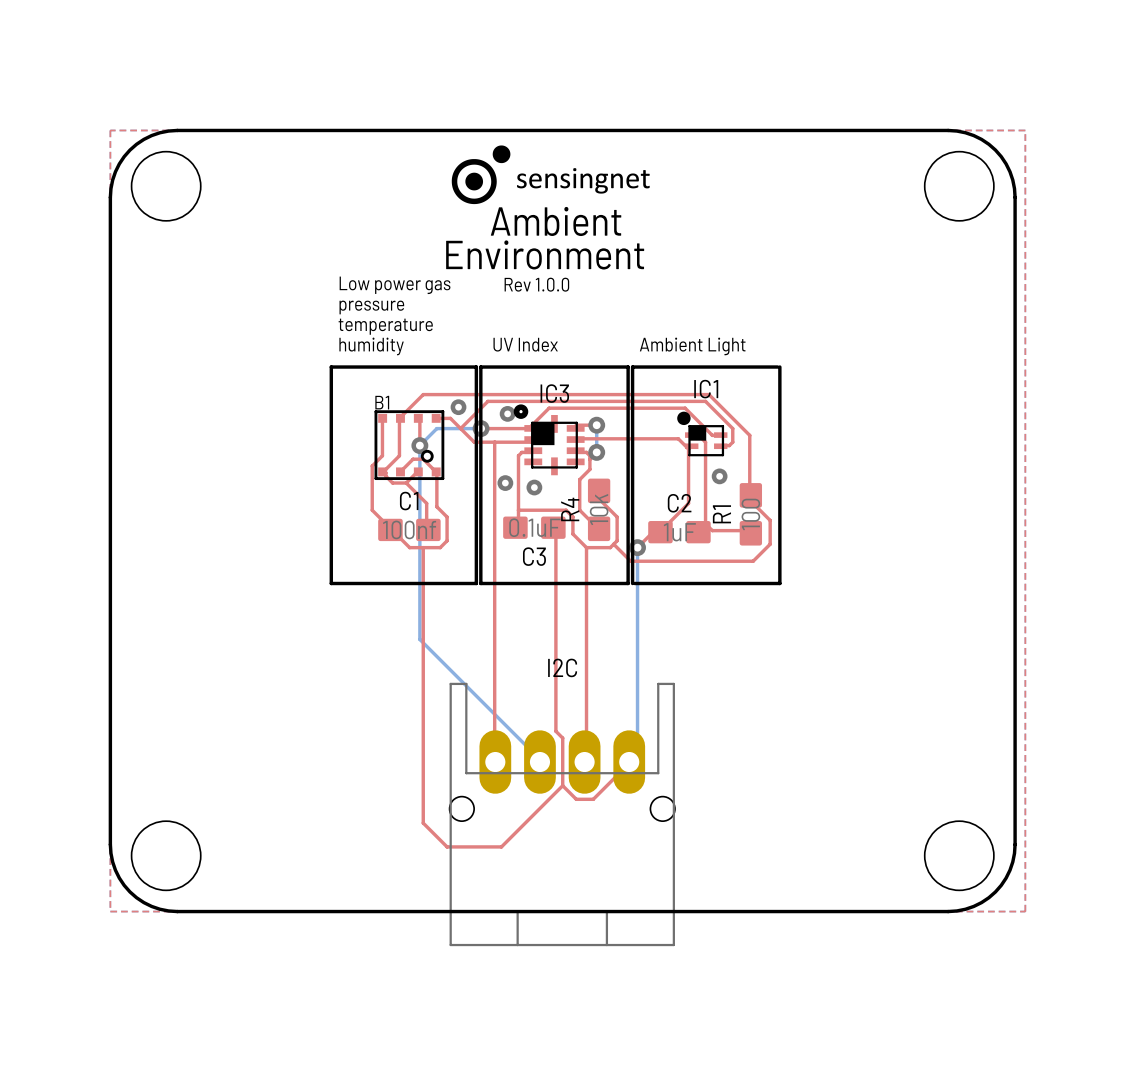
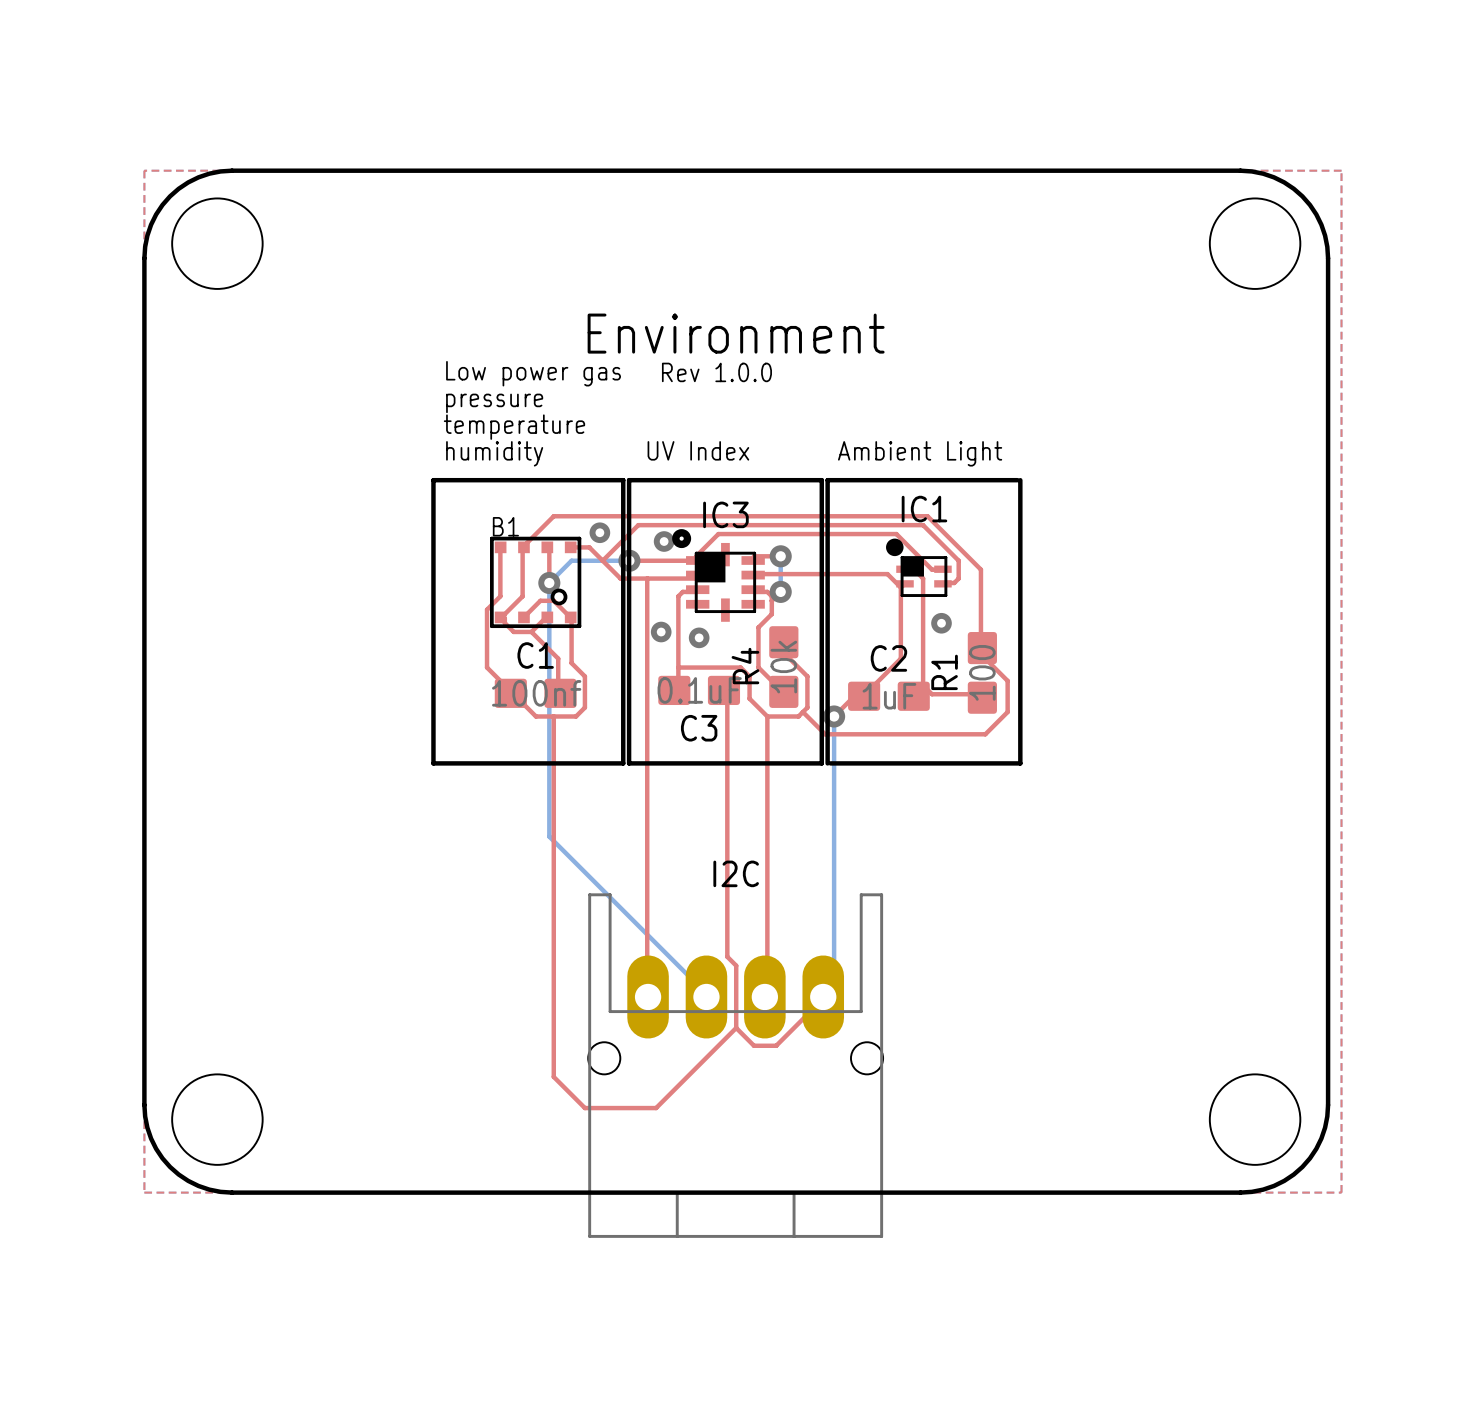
drawing: [451, 145, 650, 205] -> none
text: Ambient (556, 221) -> none

